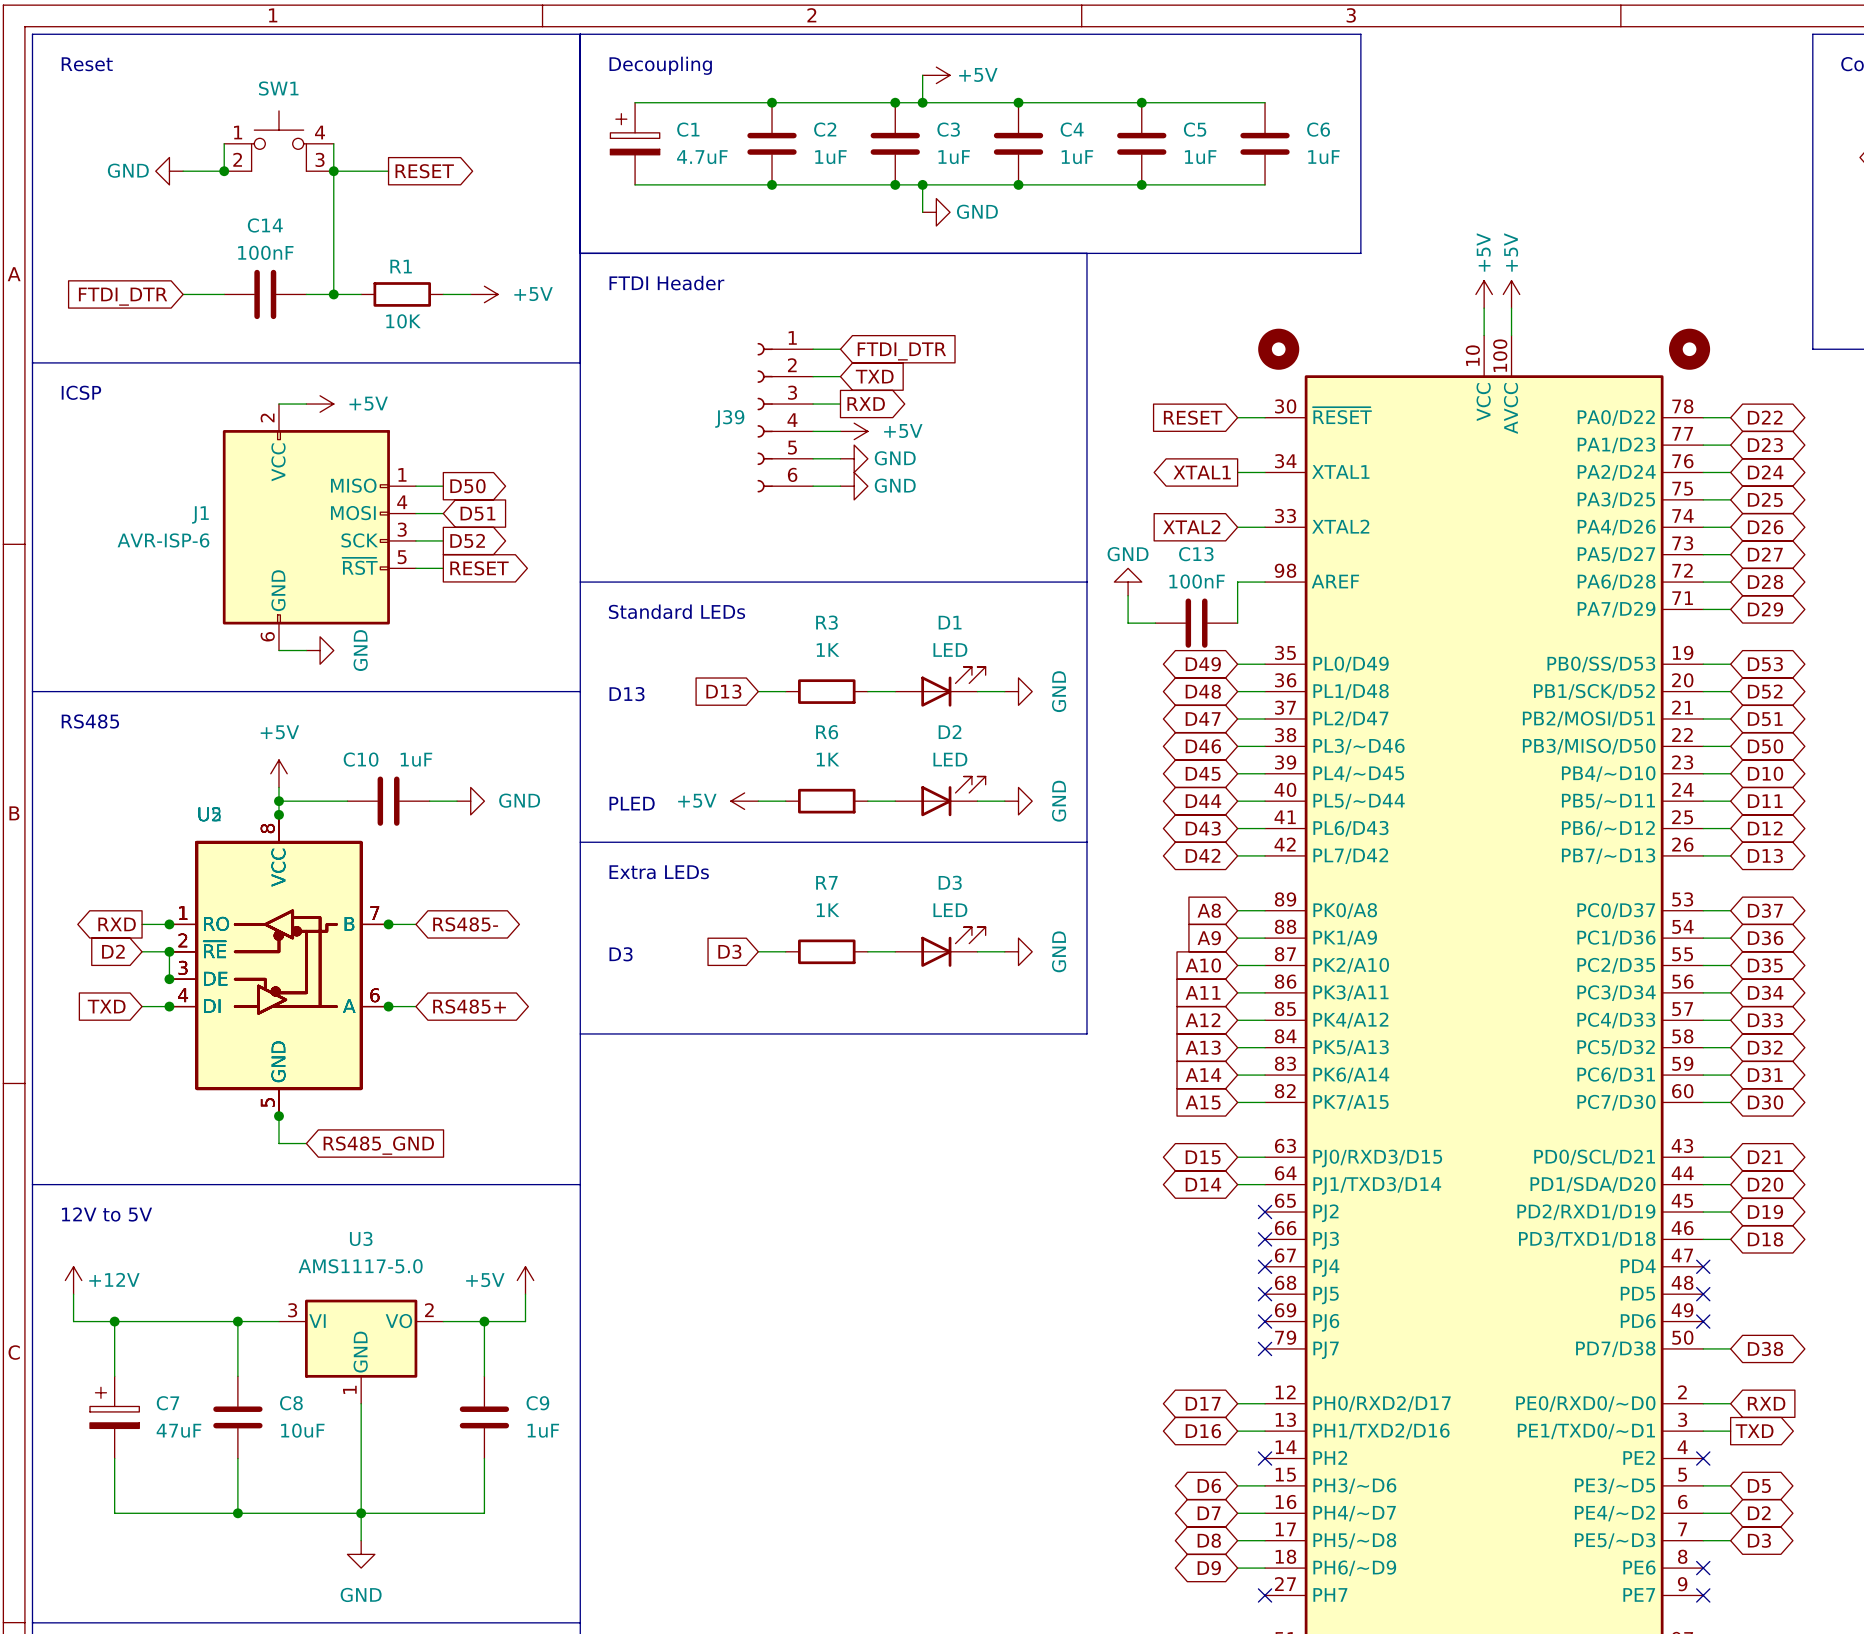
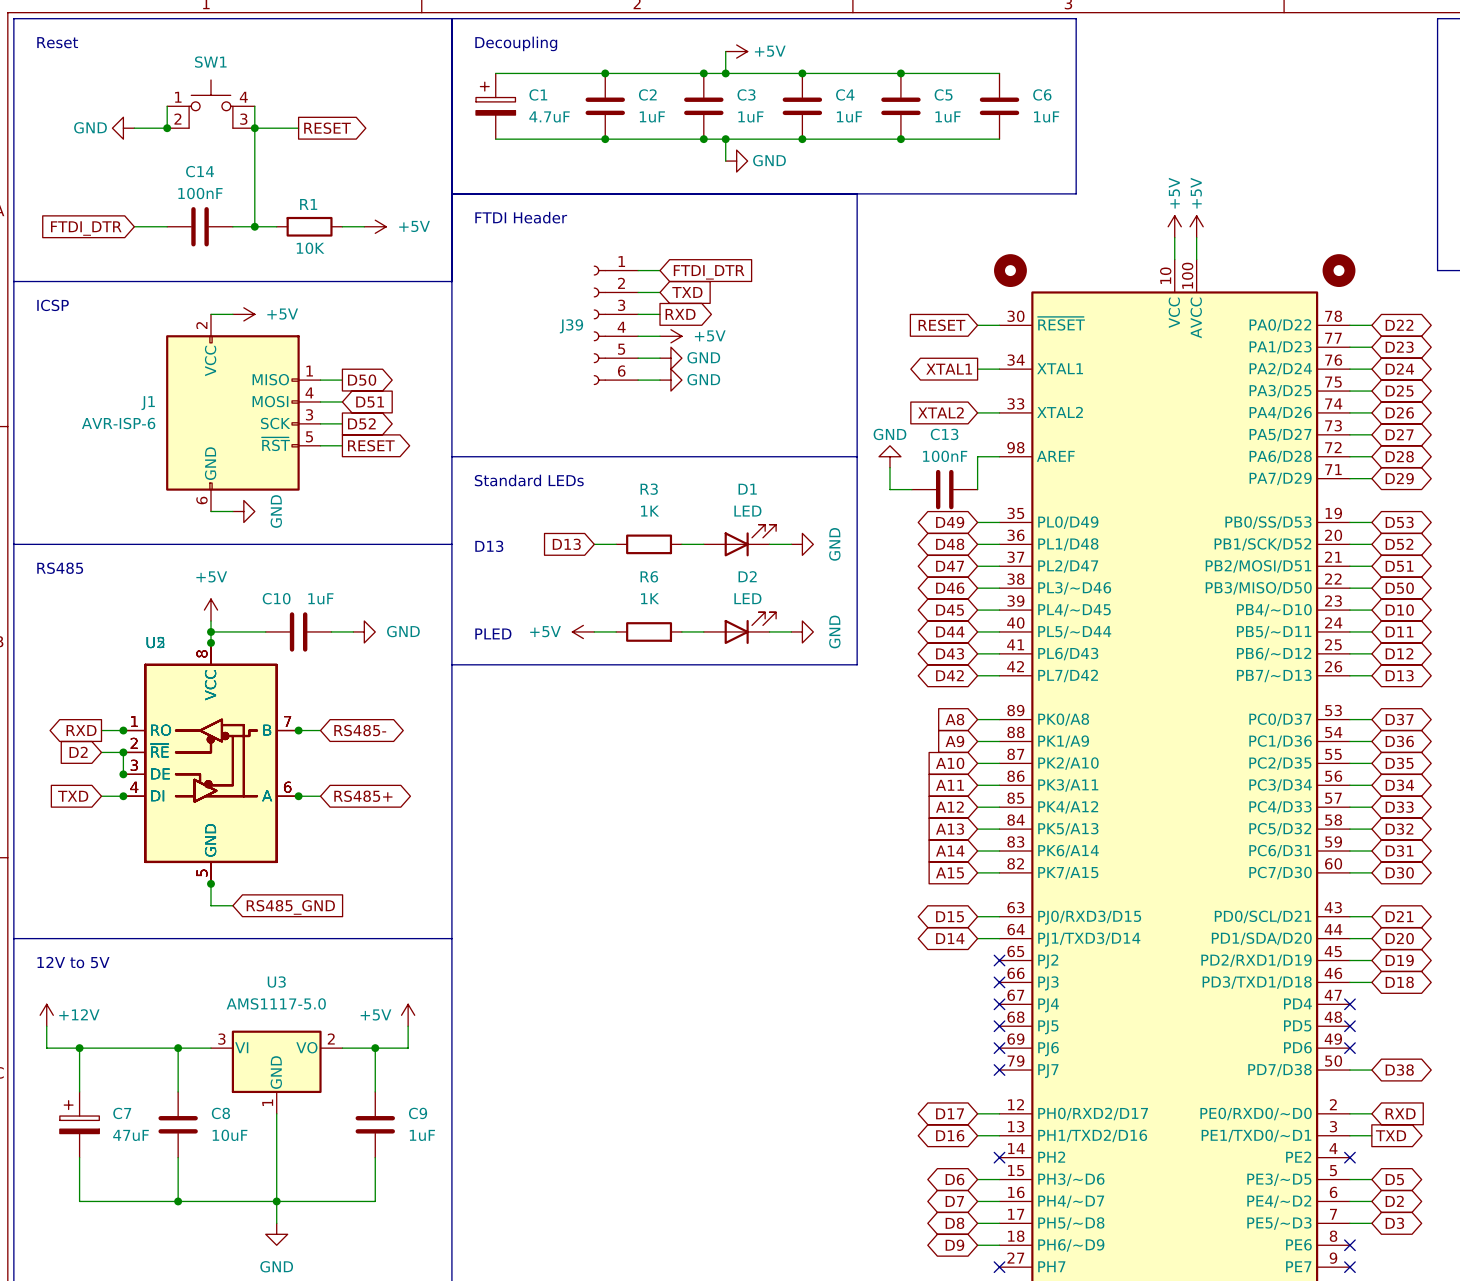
line: (1086, 842) (1086, 1033) (580, 1033) -> none
text: Extra LEDs (659, 872) -> none
D3: LED (940, 947) -> none
global label: D3 (729, 951) -> none
wire: (758, 951) (785, 951) -> none
R7: 1K (826, 951) -> none
wire: (867, 951) (895, 951) -> none
wire: (977, 951) (1004, 951) -> none
power symbol: GND (1018, 951) -> none
text: D3 (621, 954) -> none

